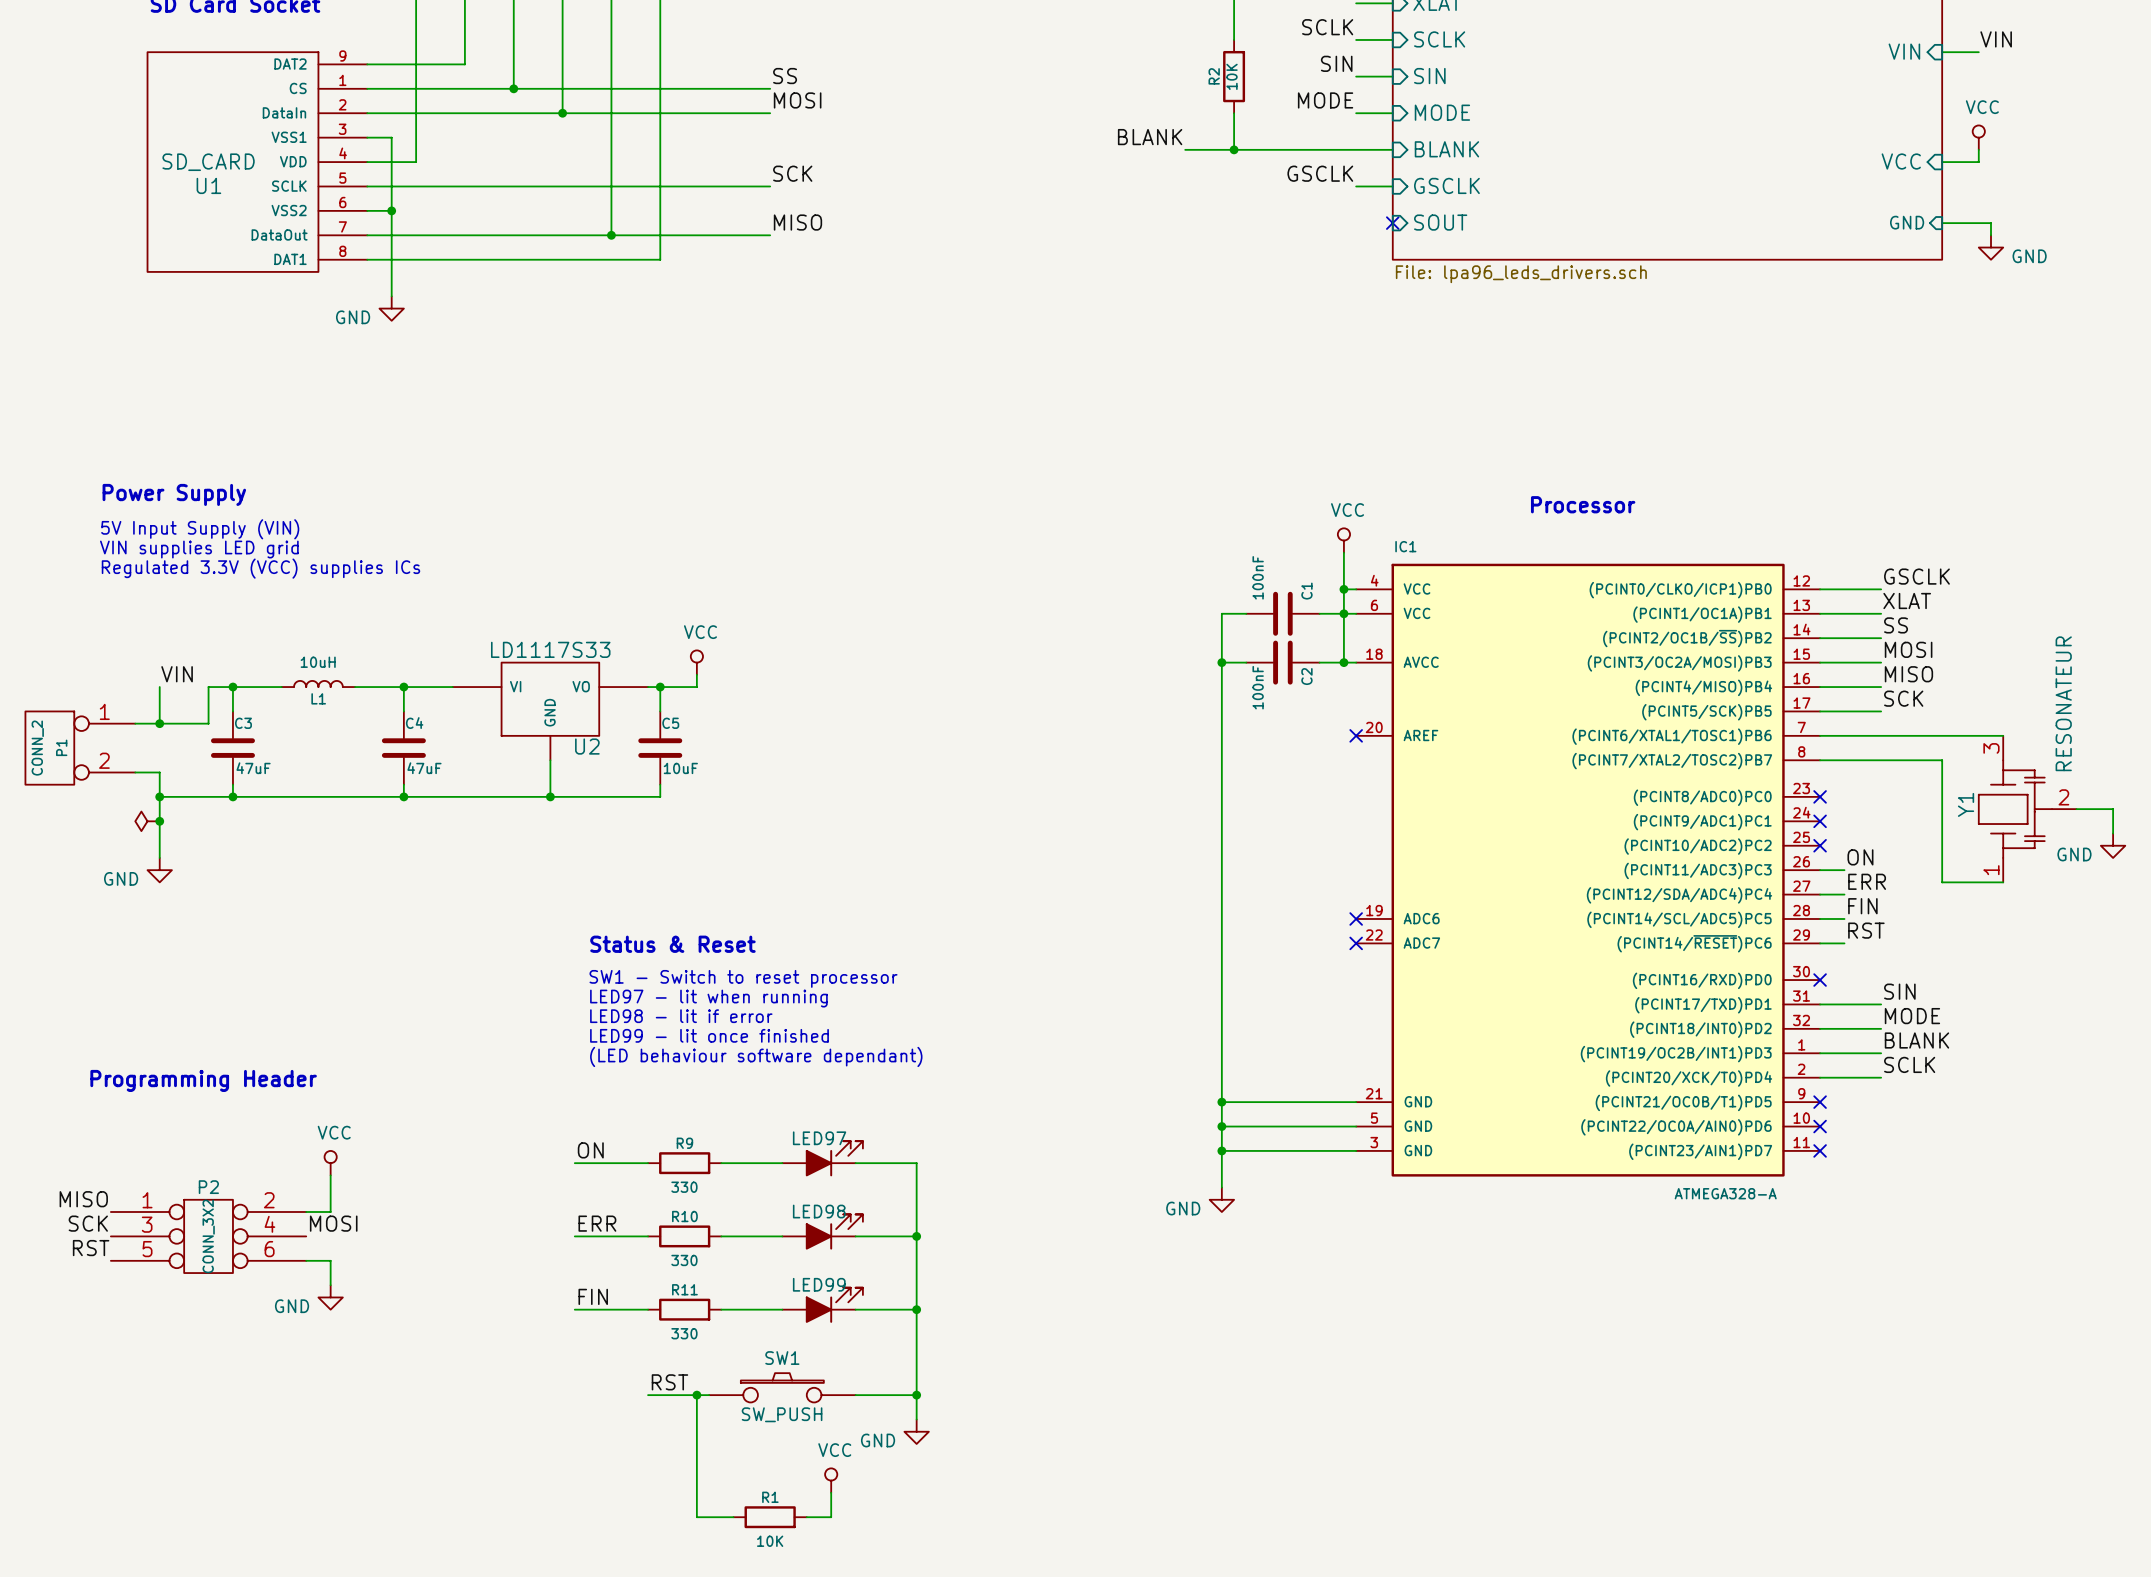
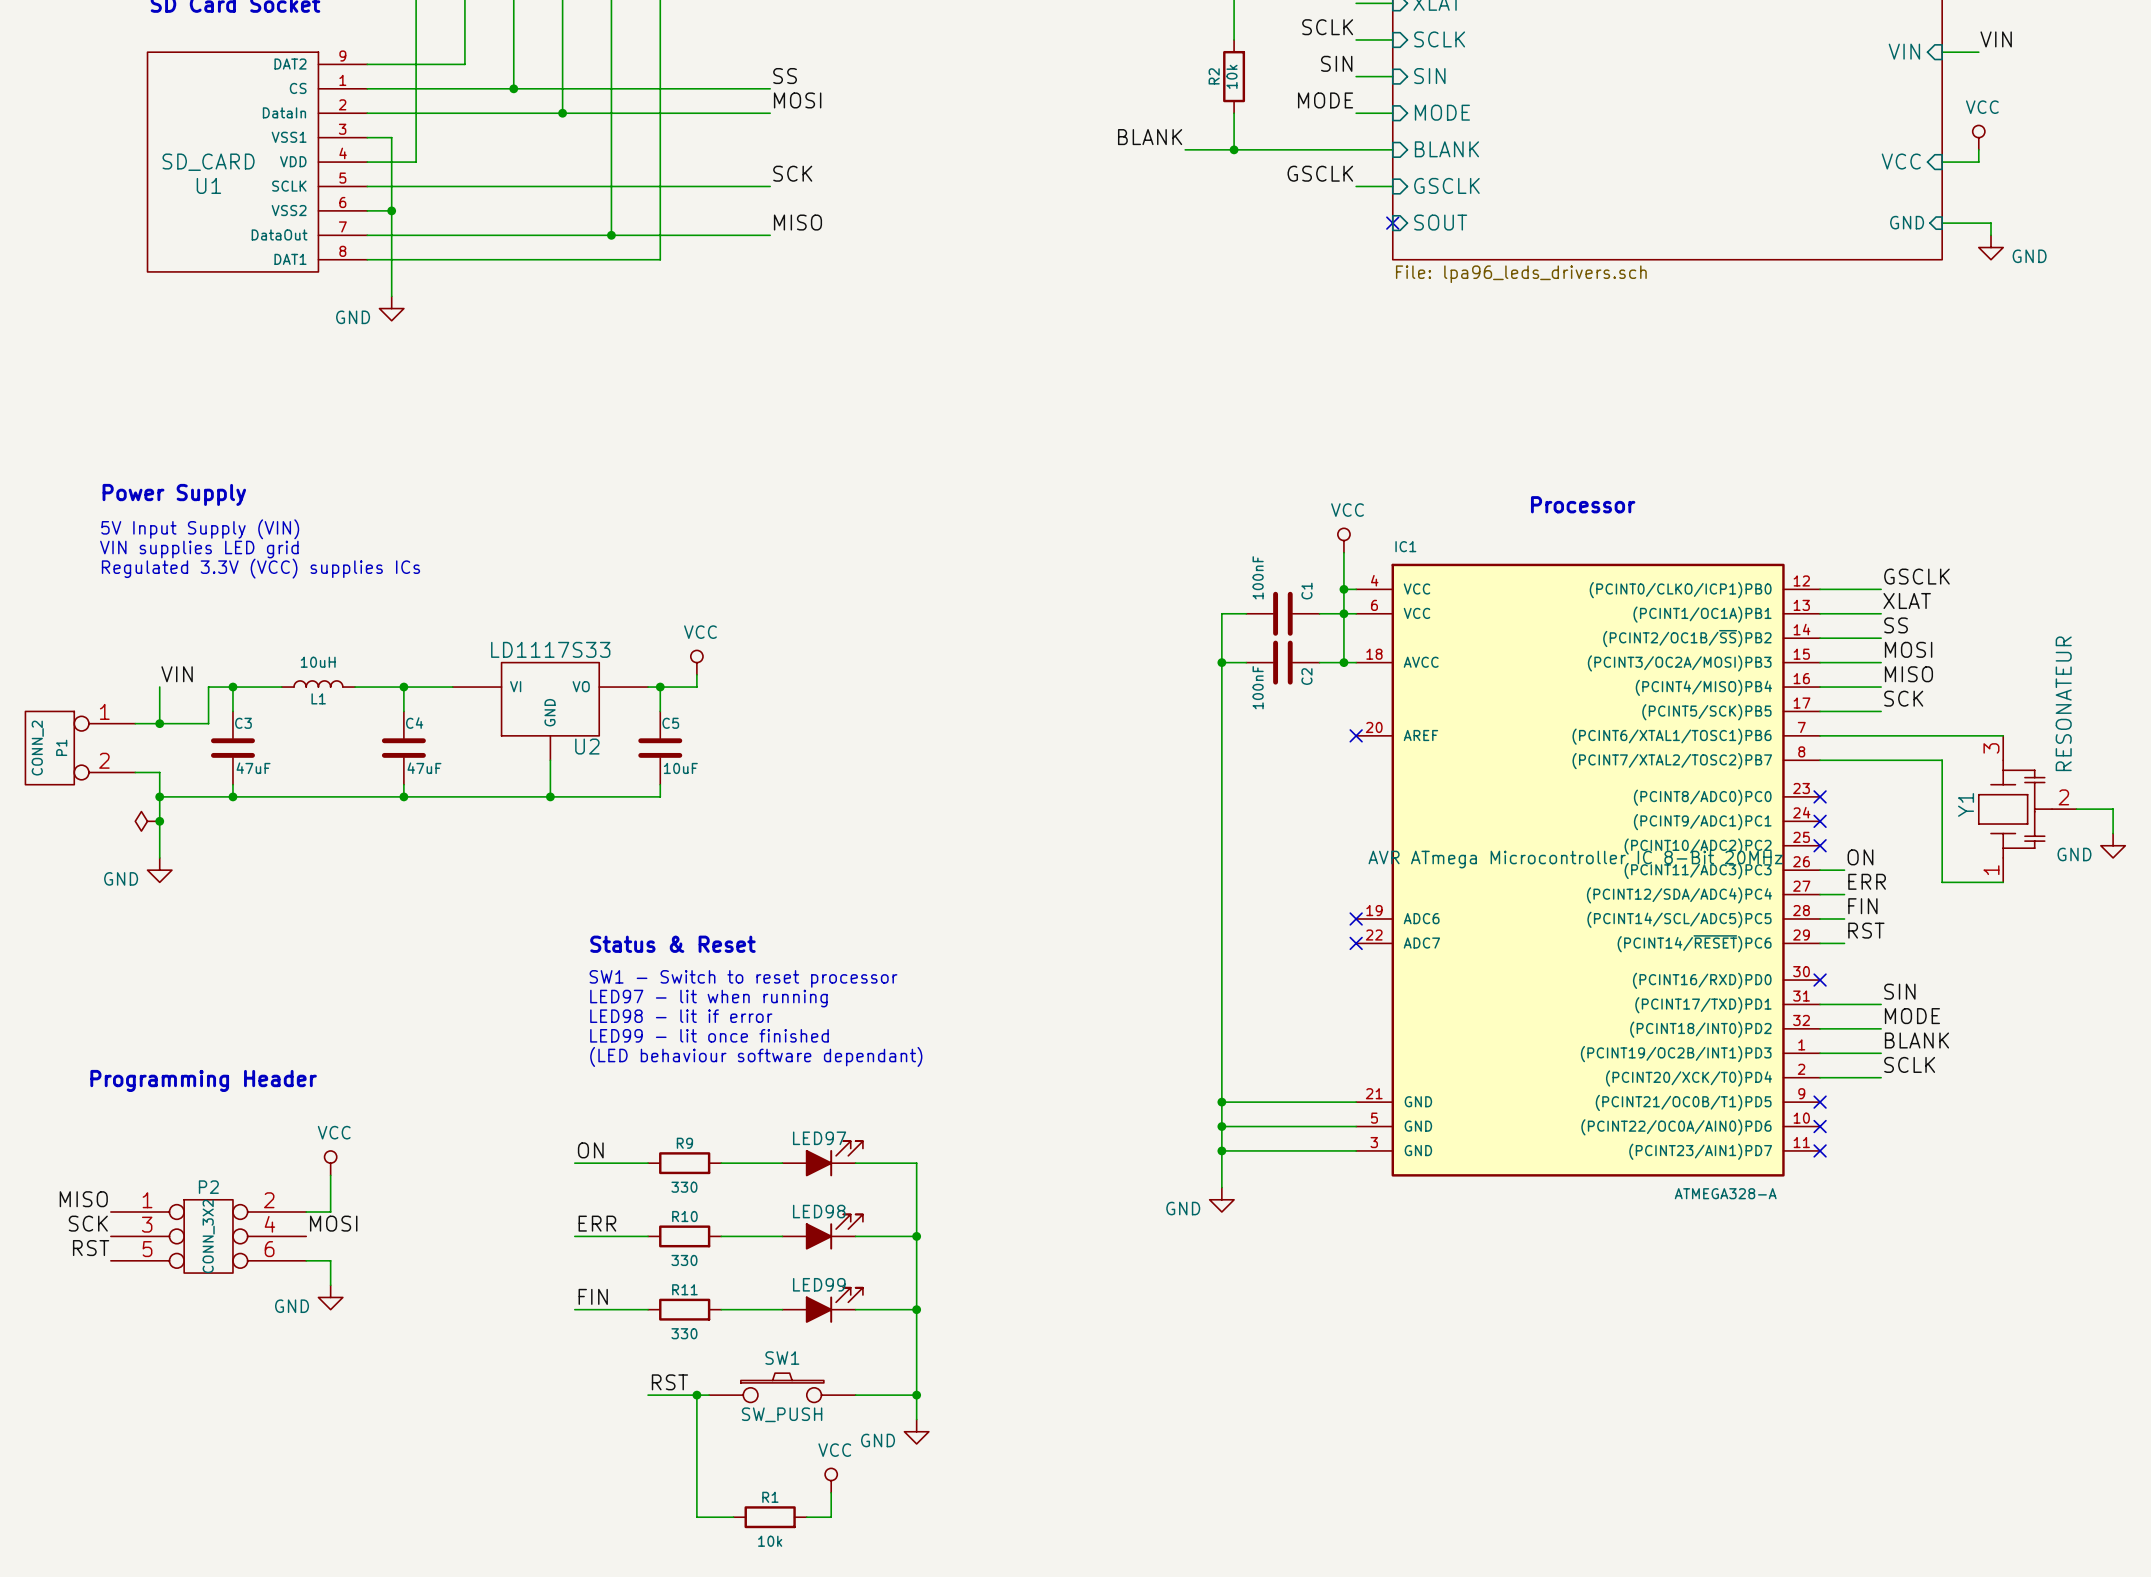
R2 value: 10K (1232, 76) -> 10k (1232, 76)
IC1 text: none -> AVR ATmega Microcontroller IC 8-Bit 20MHz (1575, 859)
R1 value: 10K (770, 1541) -> 10k (770, 1541)

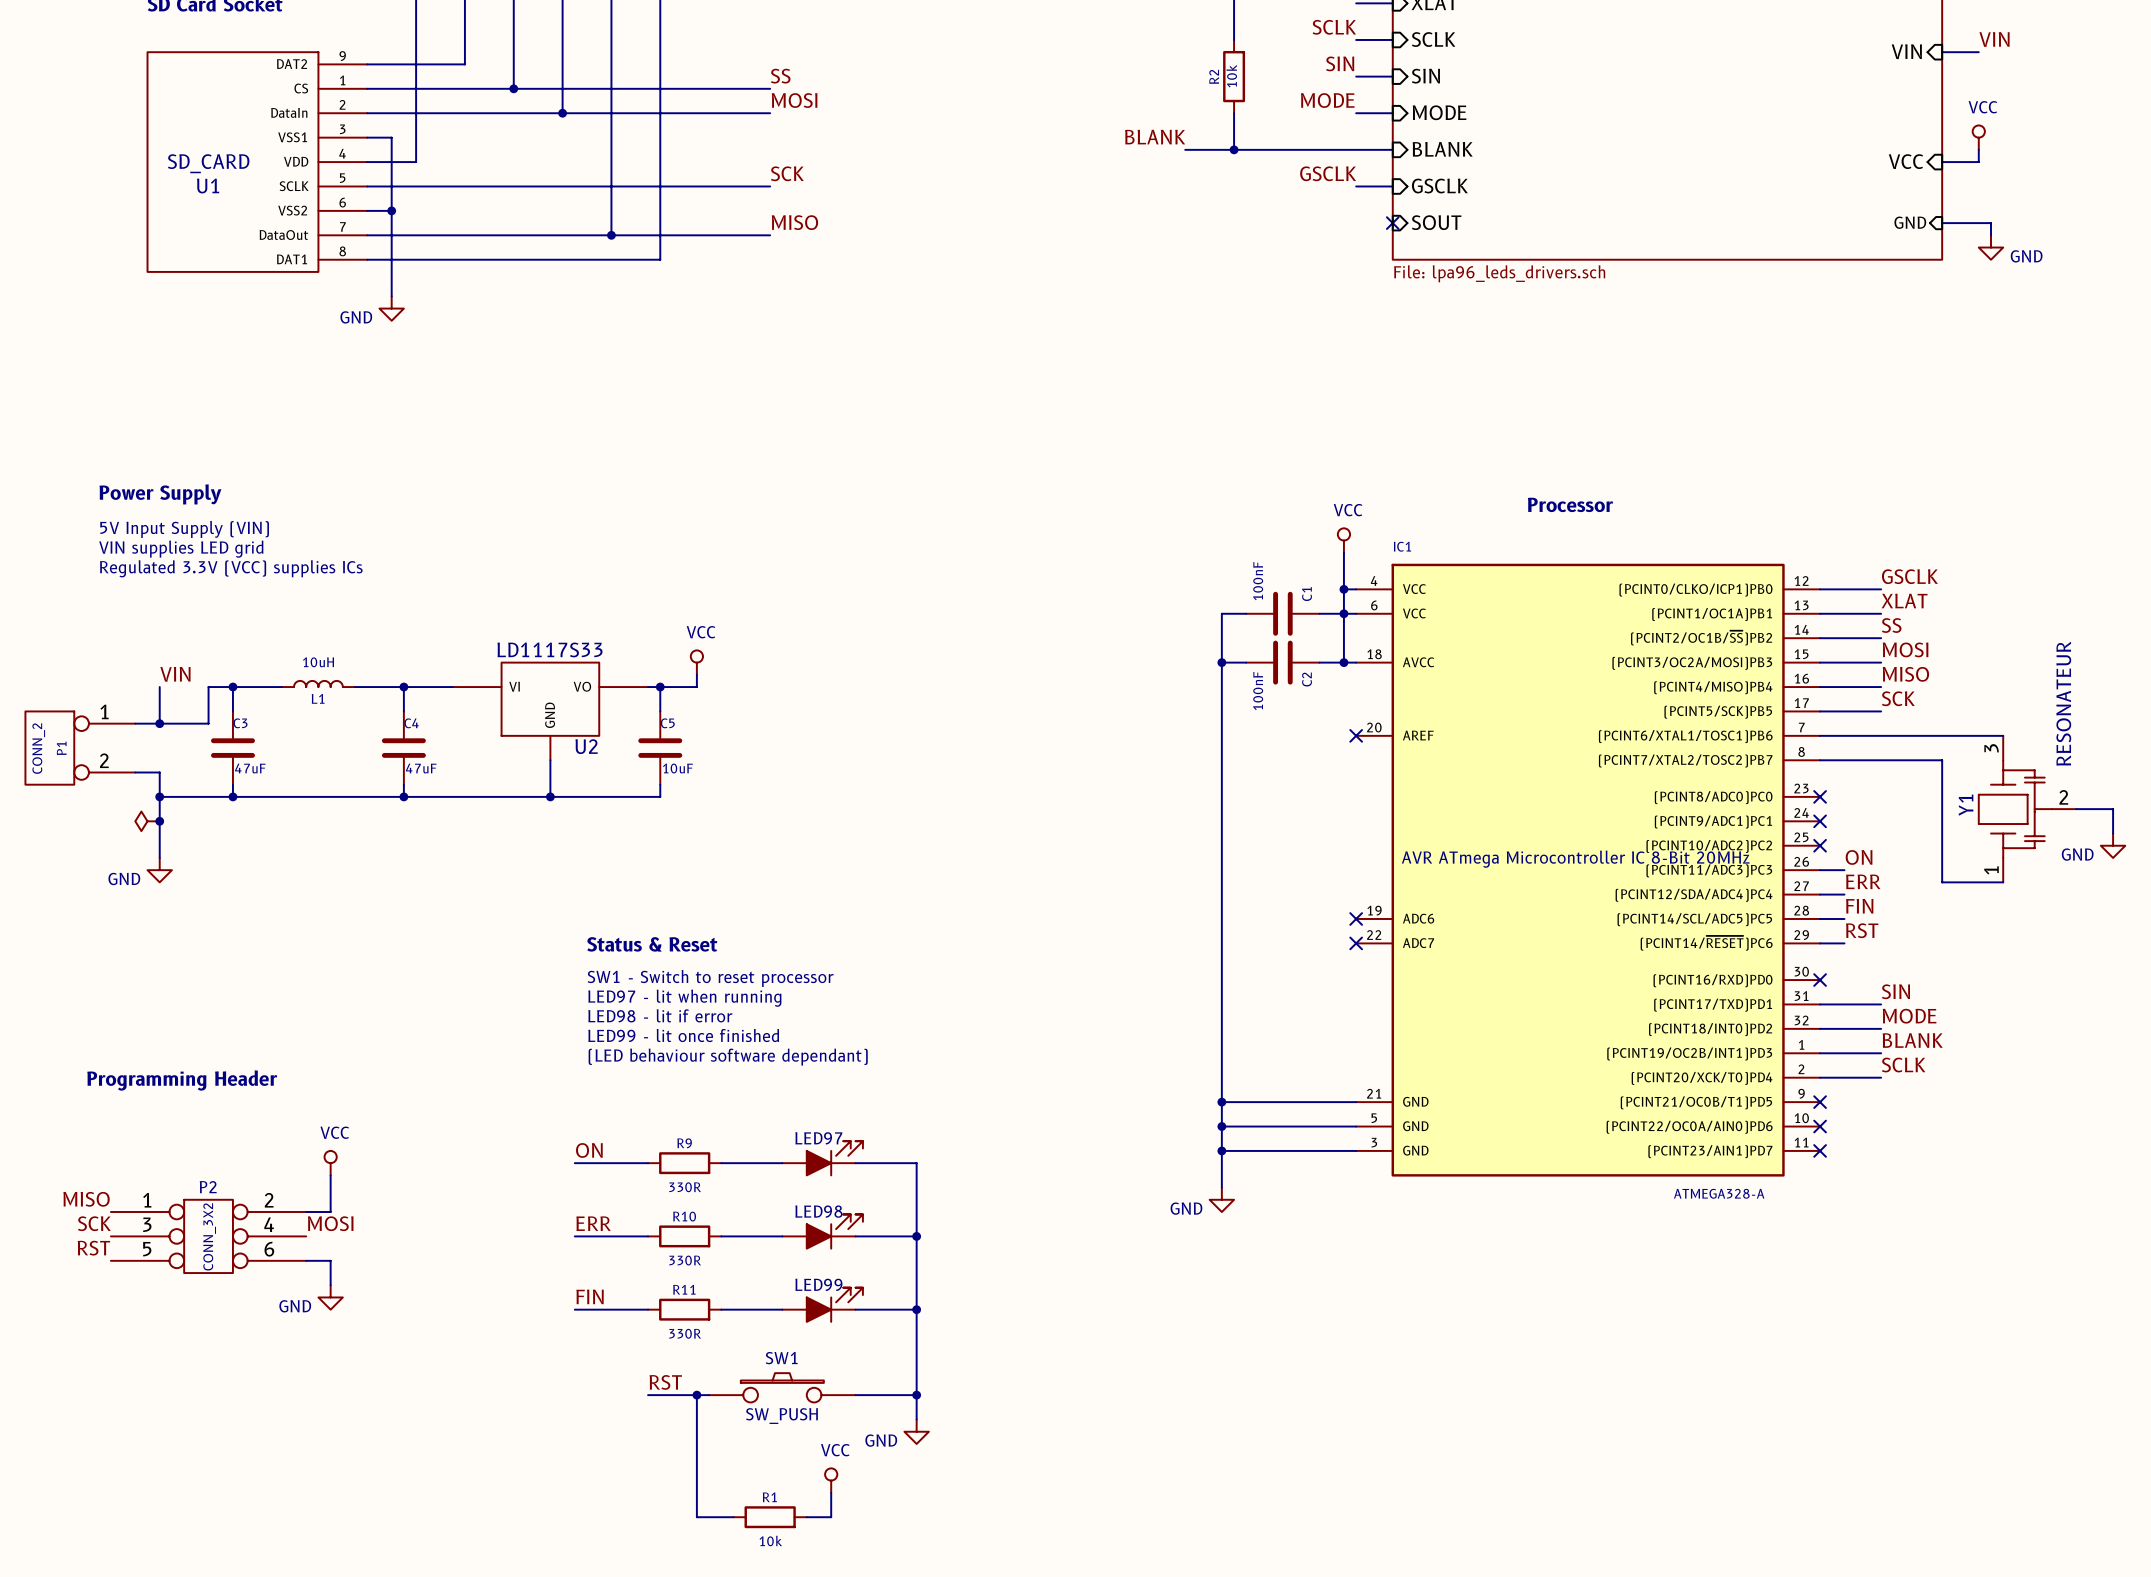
R9 value: 330 (684, 1187) -> 330R (685, 1187)
R10 value: 330 (684, 1260) -> 330R (685, 1260)
R11 value: 330 (684, 1333) -> 330R (685, 1333)

